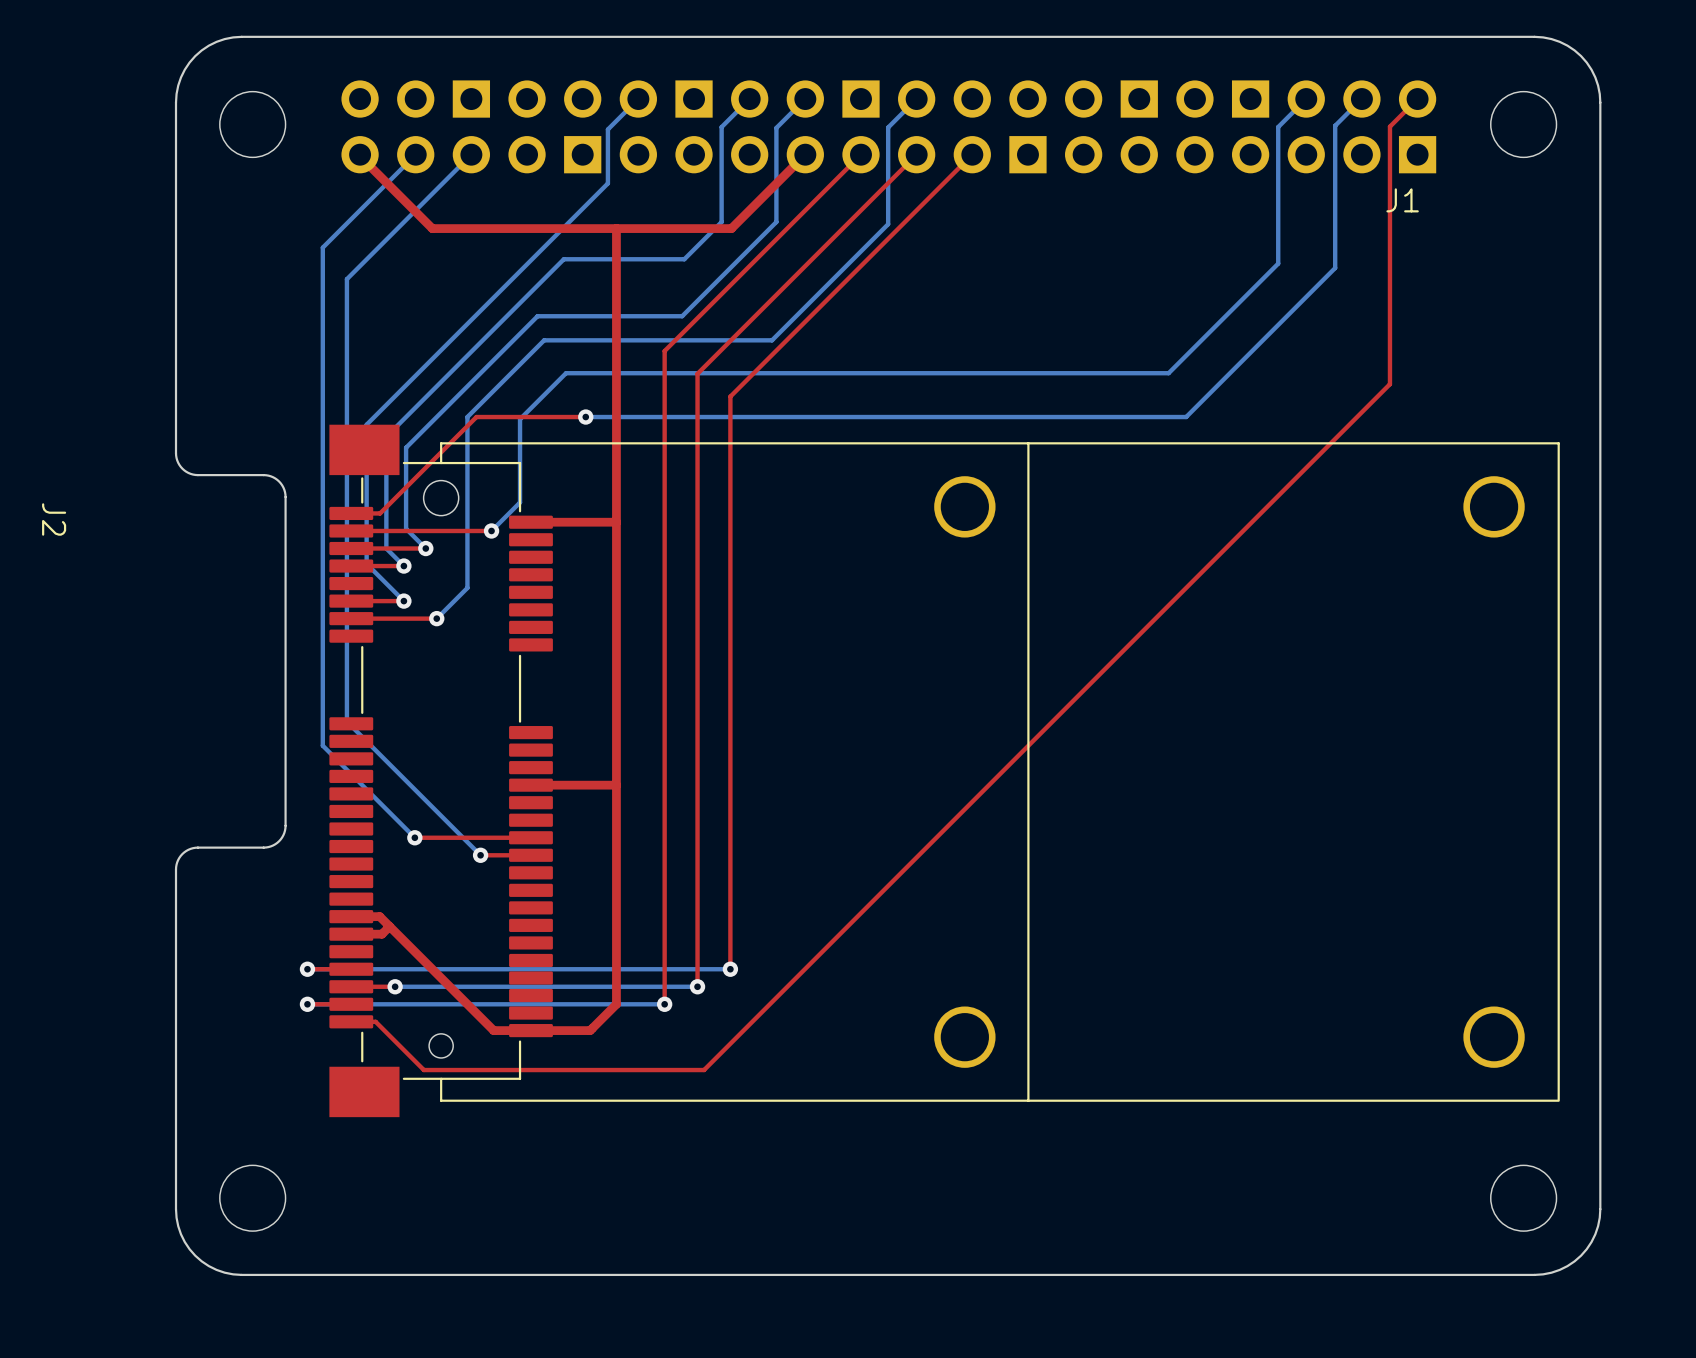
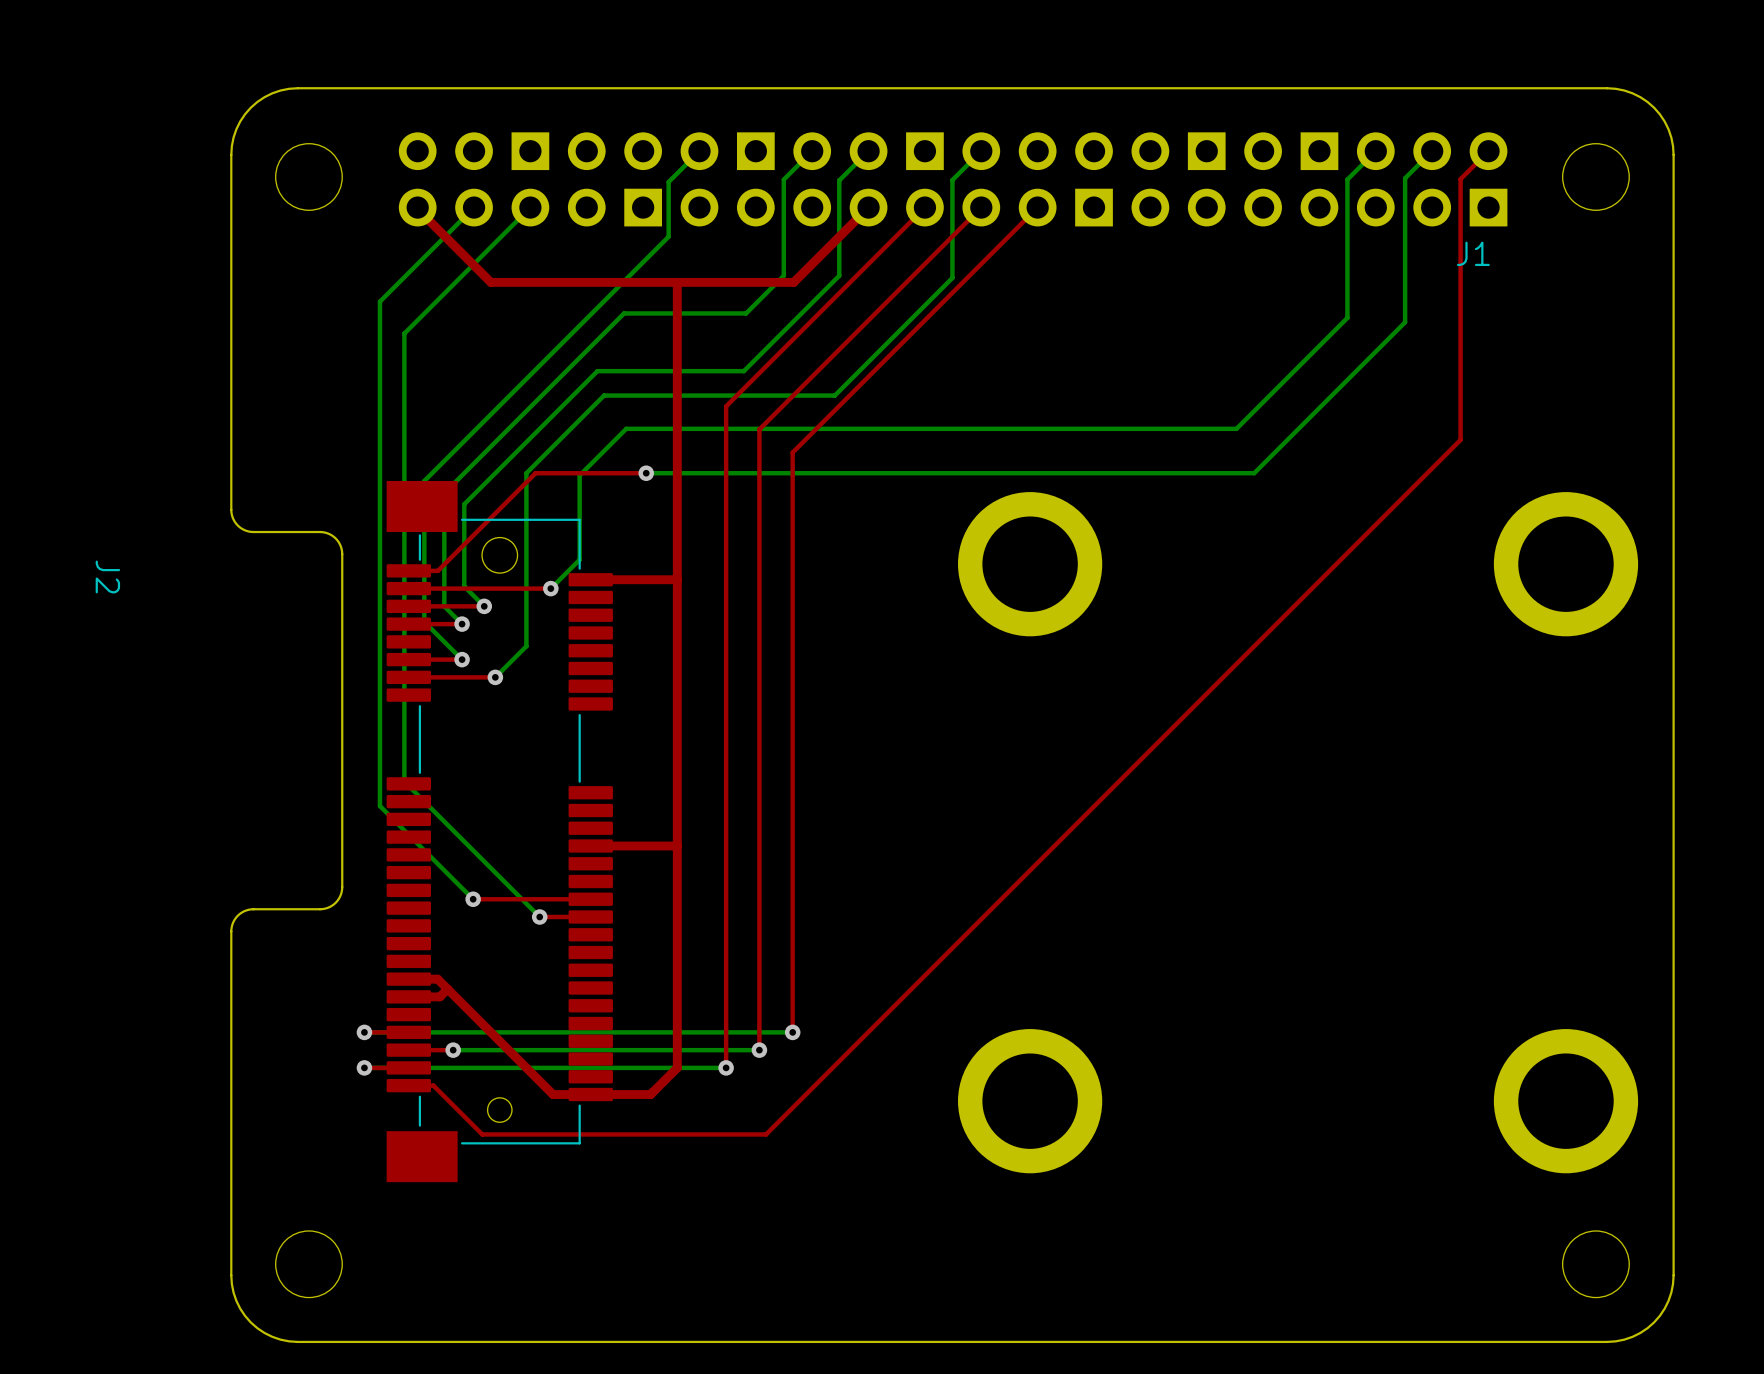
J2 footprint: [329, 424, 1560, 1118] -> [386, 480, 1639, 1183]

